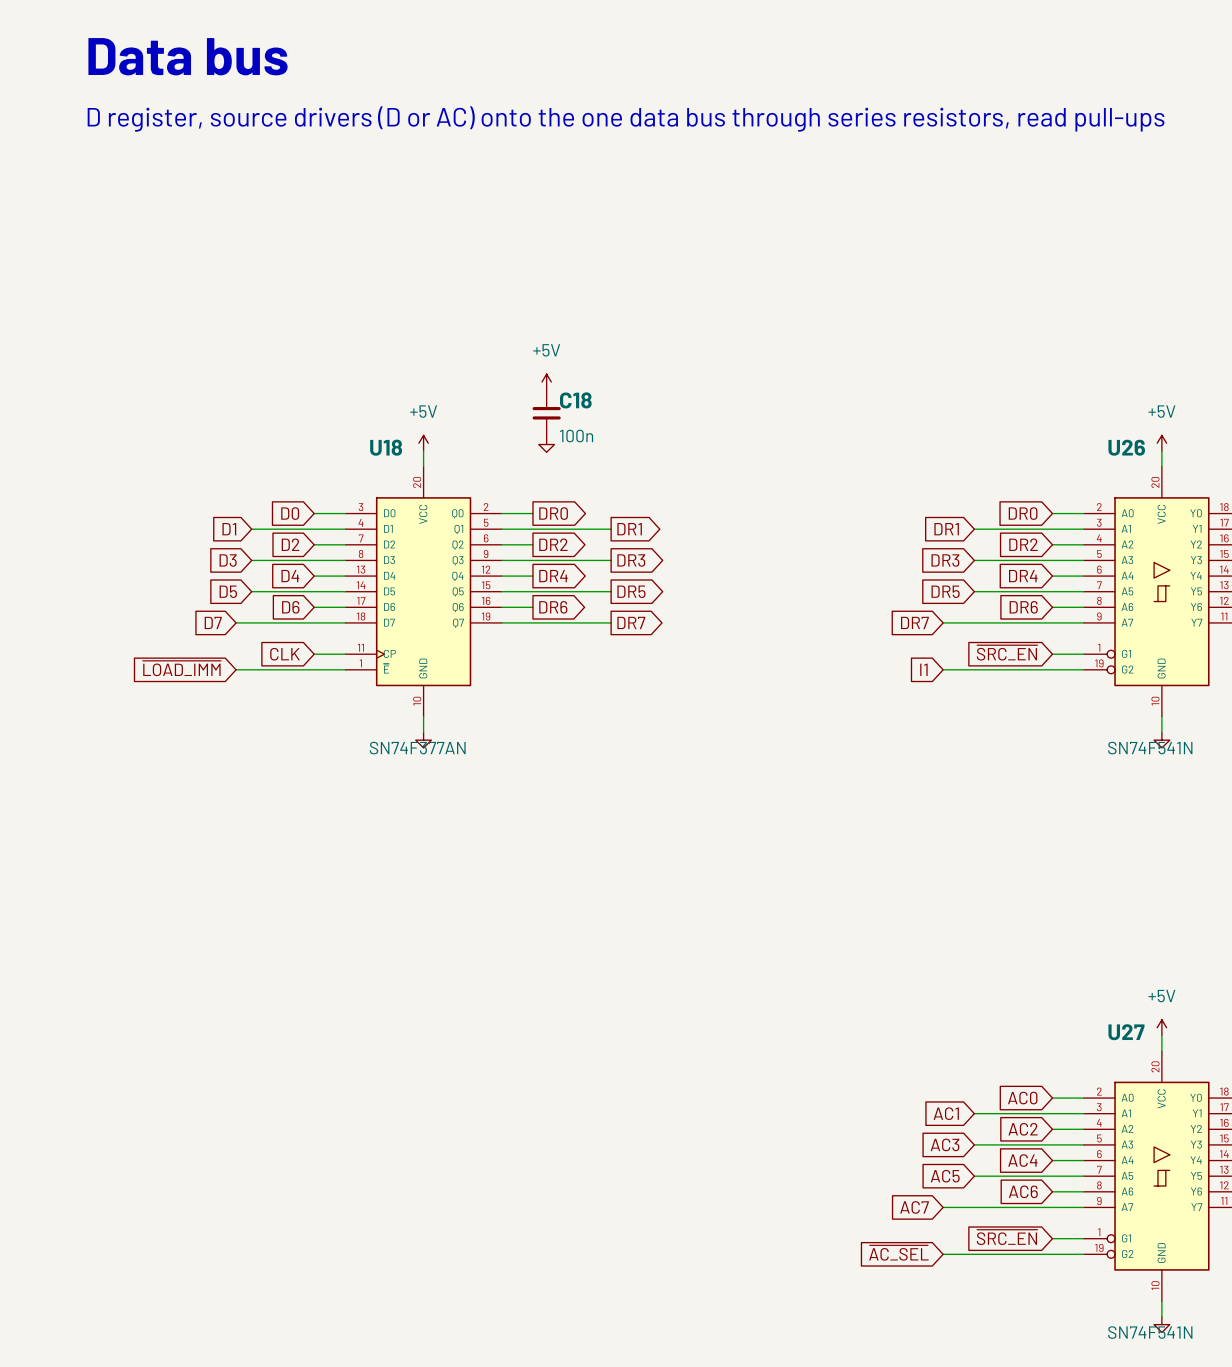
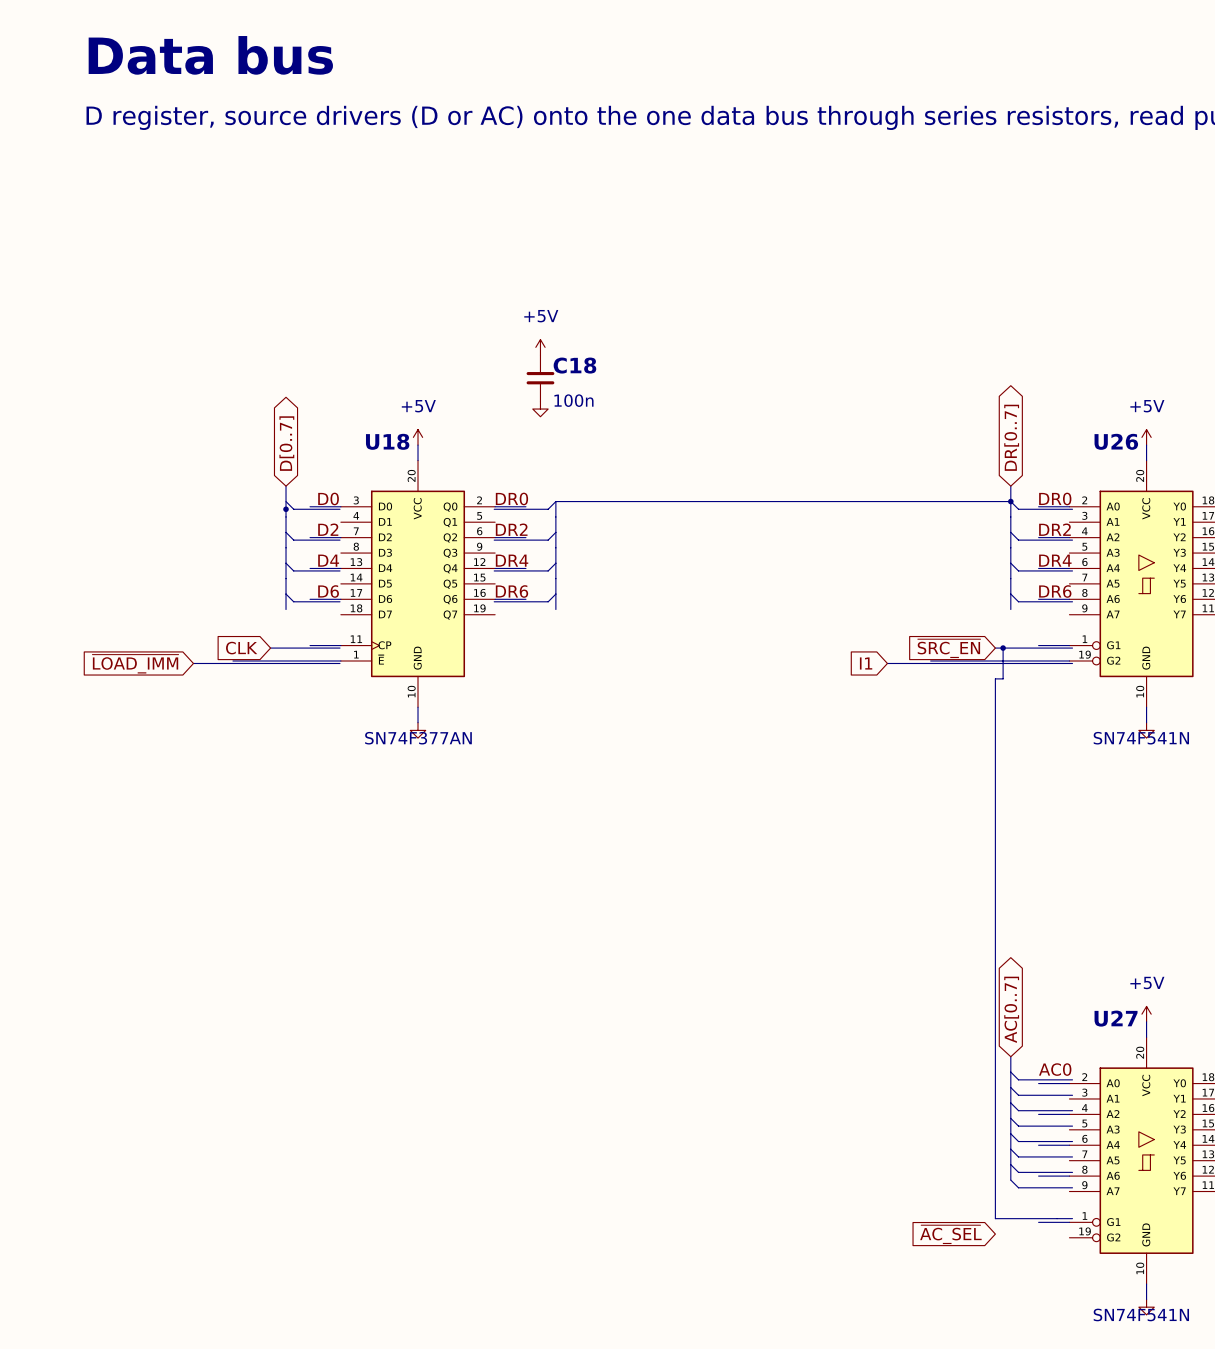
power symbol position: +5V (546, 382) -> +5V (540, 347)
C18 position: (546, 413) -> (540, 378)
power symbol position: (546, 444) -> (540, 409)
global label: none -> DR[0..7] (1011, 437)
global label: none -> D[0..7] (286, 443)
bus: none -> (286, 486) (286, 609)
bus: none -> (1010, 486) (1010, 609)
label: none -> D0 (328, 498)
label: none -> DR0 (511, 498)
label: none -> DR0 (1055, 498)
wire: none -> (286, 501) (293, 509) (339, 509)
wire: none -> (555, 501) (548, 509) (494, 509)
wire: none -> (1010, 501) (1018, 509) (1072, 509)
bus: none -> (1010, 501) (555, 501) (555, 609)
junction: none -> (1010, 501)
global label: D0 (290, 513) -> none
global label: DR0 (553, 513) -> none
global label: DR0 (1023, 513) -> none
junction: none -> (286, 509)
global label: D1 (229, 529) -> none
wire: (251, 529) (345, 529) -> none
wire: (501, 529) (611, 529) -> none
global label: DR1 (629, 529) -> none
global label: DR1 (946, 529) -> none
wire: (974, 529) (1083, 529) -> none
label: none -> D2 (328, 529)
label: none -> DR2 (511, 529)
label: none -> DR2 (1054, 529)
wire: none -> (286, 532) (293, 540) (339, 540)
wire: none -> (555, 532) (548, 540) (494, 540)
wire: none -> (1010, 532) (1018, 540) (1072, 540)
global label: D2 (290, 544) -> none
global label: DR2 (553, 544) -> none
global label: DR2 (1023, 544) -> none
global label: D3 (228, 560) -> none
wire: (251, 560) (345, 560) -> none
wire: (501, 560) (611, 560) -> none
global label: DR3 (631, 560) -> none
global label: DR3 (945, 560) -> none
wire: (974, 560) (1083, 560) -> none
label: none -> D4 (328, 560)
label: none -> DR4 (512, 560)
label: none -> DR4 (1055, 560)
wire: none -> (286, 563) (293, 570) (339, 570)
wire: none -> (555, 563) (548, 570) (494, 570)
wire: none -> (1010, 563) (1018, 570) (1072, 570)
global label: D4 (290, 576) -> none
global label: DR4 (553, 576) -> none
global label: DR4 (1023, 576) -> none
global label: D5 (228, 591) -> none
wire: (251, 591) (345, 591) -> none
wire: (501, 591) (611, 591) -> none
global label: DR5 (631, 591) -> none
global label: DR5 (945, 591) -> none
wire: (974, 591) (1083, 591) -> none
label: none -> D6 (328, 591)
label: none -> DR6 (511, 591)
label: none -> DR6 (1055, 591)
wire: none -> (286, 594) (293, 601) (339, 601)
wire: none -> (555, 594) (548, 601) (494, 601)
wire: none -> (1010, 594) (1018, 601) (1072, 601)
global label: D6 (290, 607) -> none
global label: DR6 (553, 607) -> none
global label: DR6 (1023, 607) -> none
global label: D7 (213, 622) -> none
wire: (236, 622) (345, 622) -> none
wire: (501, 622) (611, 622) -> none
global label: DR7 (631, 622) -> none
global label: DR7 (914, 622) -> none
wire: (943, 622) (1083, 622) -> none
global label position: ~{SRC_EN} (1007, 652) -> ~{SRC_EN} (949, 648)
global label position: CLK (285, 654) -> CLK (241, 648)
wire: none -> (270, 648) (339, 648)
wire: none -> (995, 648) (1072, 648)
wire: none -> (1003, 648) (1003, 678) (995, 678) (995, 1218) (1072, 1218)
junction: none -> (1003, 648)
global label position: ~{LOAD_IMM} (181, 668) -> ~{LOAD_IMM} (135, 664)
global label position: I1 (923, 669) -> I1 (866, 663)
wire: none -> (193, 663) (339, 663)
wire: none -> (887, 663) (1072, 663)
global label: none -> AC[0..7] (1011, 1009)
bus: none -> (1010, 1056) (1010, 1180)
label: none -> AC0 (1055, 1069)
wire: none -> (1010, 1072) (1018, 1079) (1072, 1079)
global label: AC0 (1022, 1098) -> none
wire: none -> (1010, 1087) (1018, 1095) (1072, 1095)
global label: AC1 (946, 1113) -> none
wire: (974, 1113) (1083, 1113) -> none
wire: none -> (1010, 1102) (1018, 1110) (1072, 1110)
global label: AC2 (1023, 1129) -> none
wire: none -> (1010, 1118) (1018, 1126) (1072, 1126)
global label: AC3 (945, 1144) -> none
wire: (974, 1144) (1083, 1144) -> none
wire: none -> (1010, 1133) (1018, 1141) (1072, 1141)
global label: AC4 (1022, 1160) -> none
wire: none -> (1010, 1149) (1018, 1156) (1072, 1156)
global label: AC5 (945, 1176) -> none
wire: (974, 1176) (1083, 1176) -> none
wire: none -> (1010, 1164) (1018, 1172) (1072, 1172)
global label: AC6 (1023, 1191) -> none
wire: none -> (1010, 1180) (1018, 1187) (1072, 1187)
global label: AC7 (914, 1207) -> none
wire: (943, 1207) (1083, 1207) -> none
global label: ~{SRC_EN} (1007, 1237) -> none
global label position: ~{AC_SEL} (898, 1252) -> ~{AC_SEL} (950, 1234)
wire: (943, 1254) (1083, 1254) -> none

